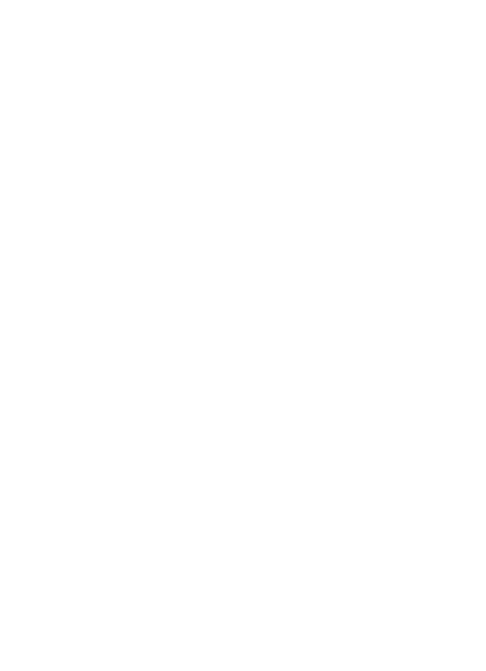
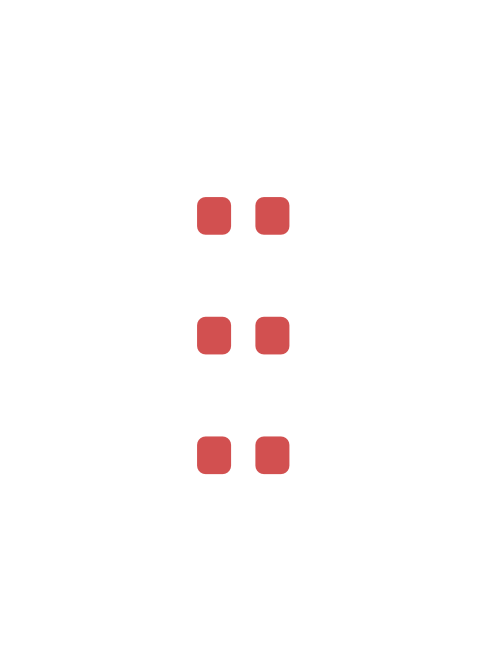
part: none -> (243, 215)
part: none -> (243, 335)
part: none -> (243, 455)

